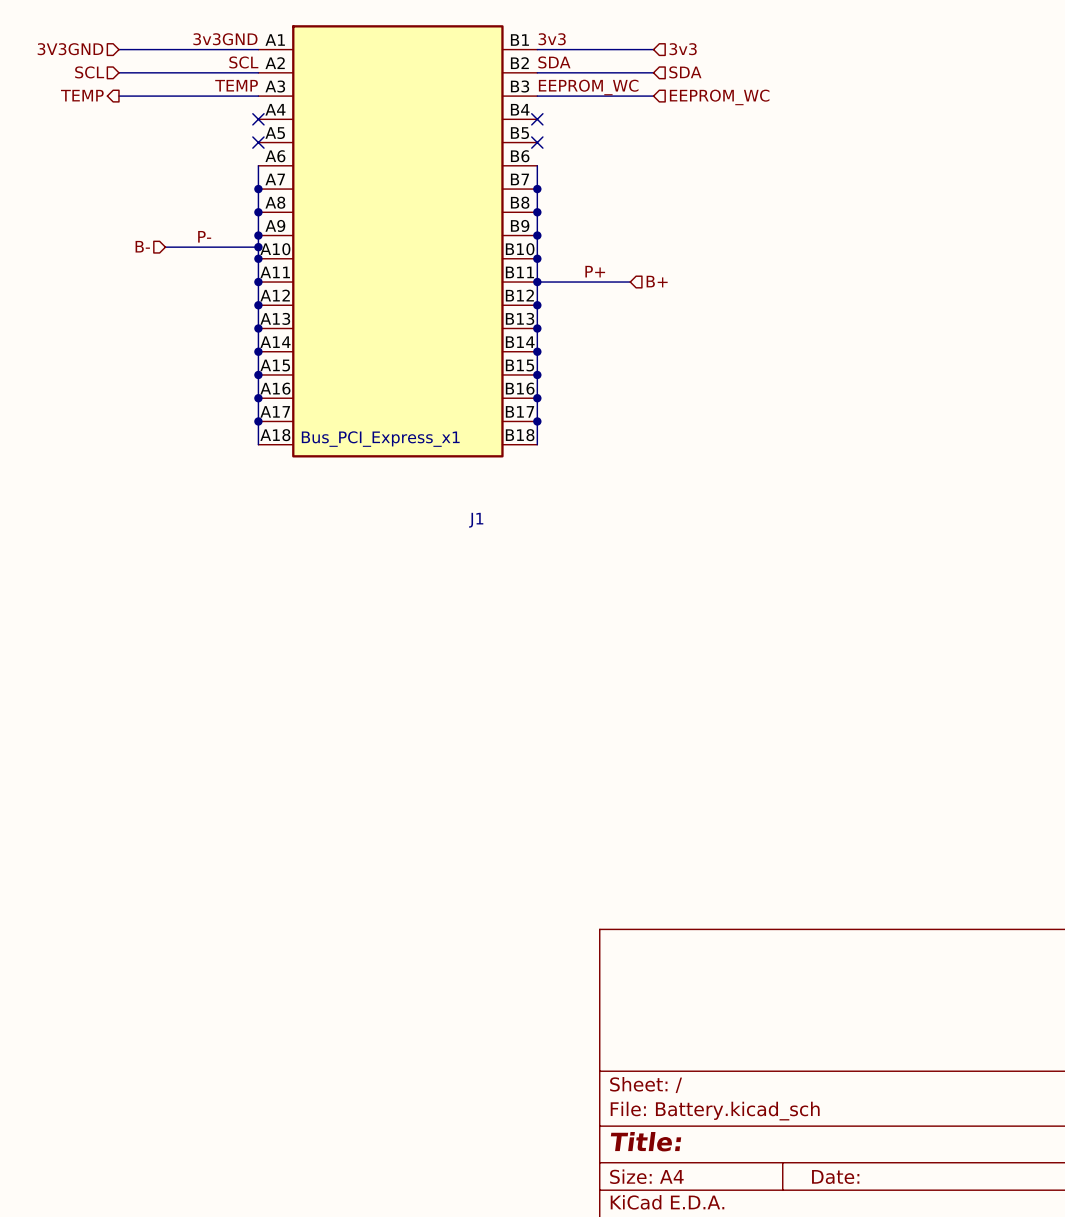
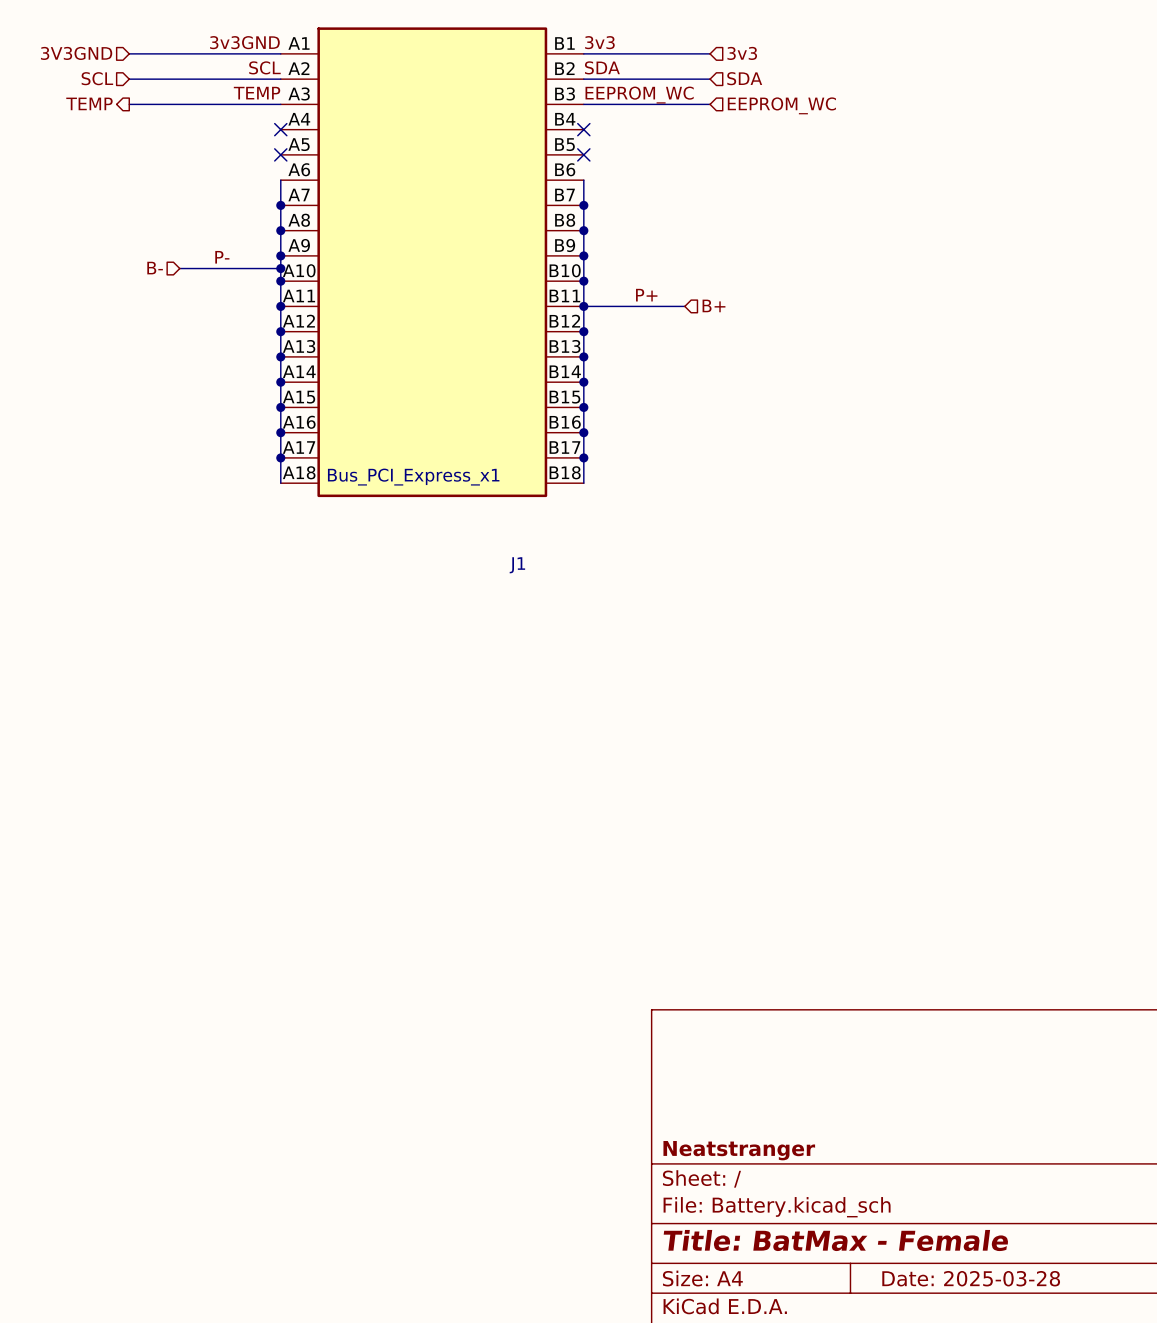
title block: none -> Neatstranger (739, 1150)
title block: Title: (646, 1141) -> Title: BatMax - Female (836, 1240)
title block: Date: (835, 1177) -> Date: 2025-03-28 (971, 1278)

